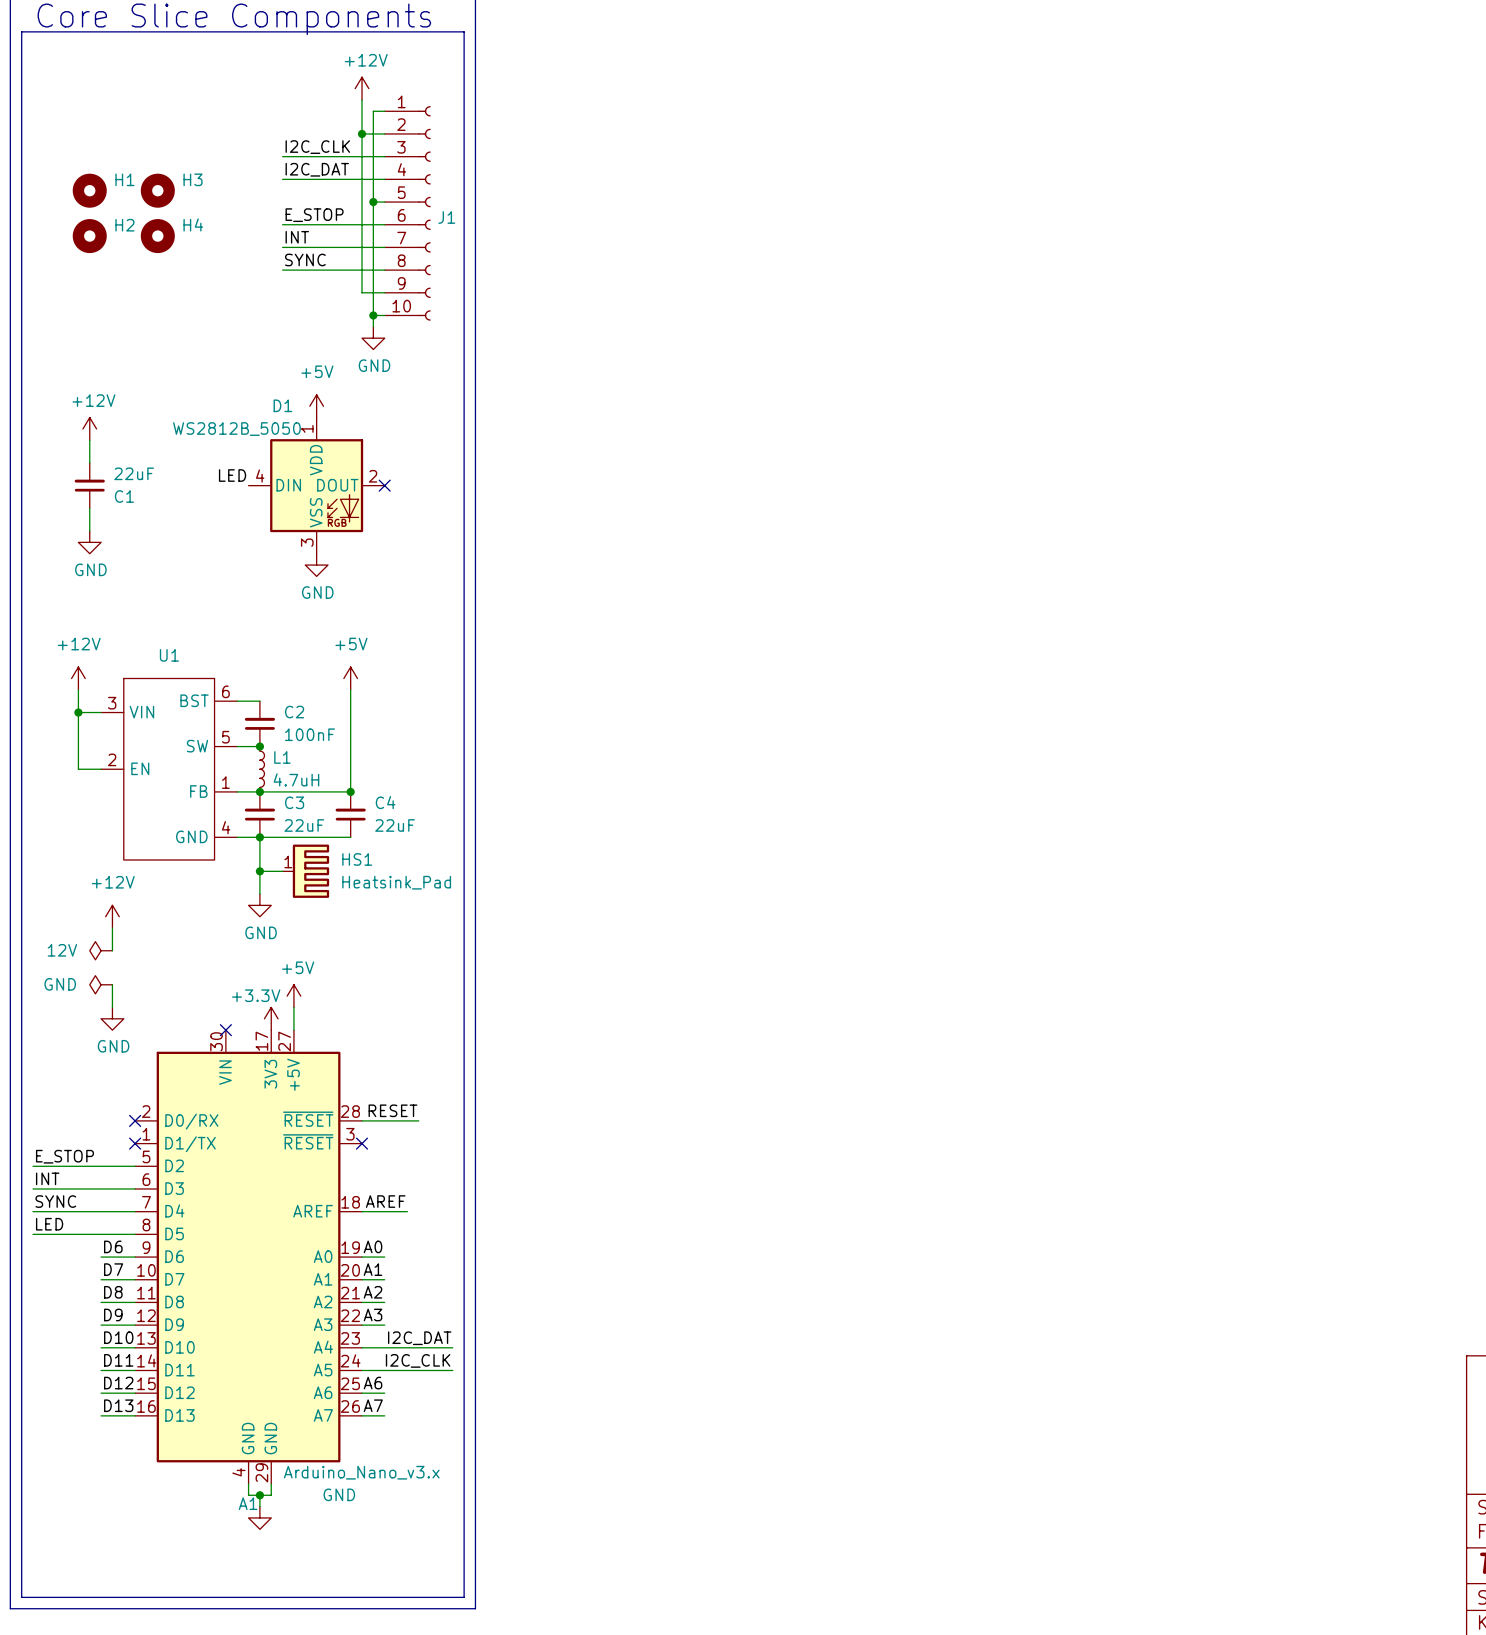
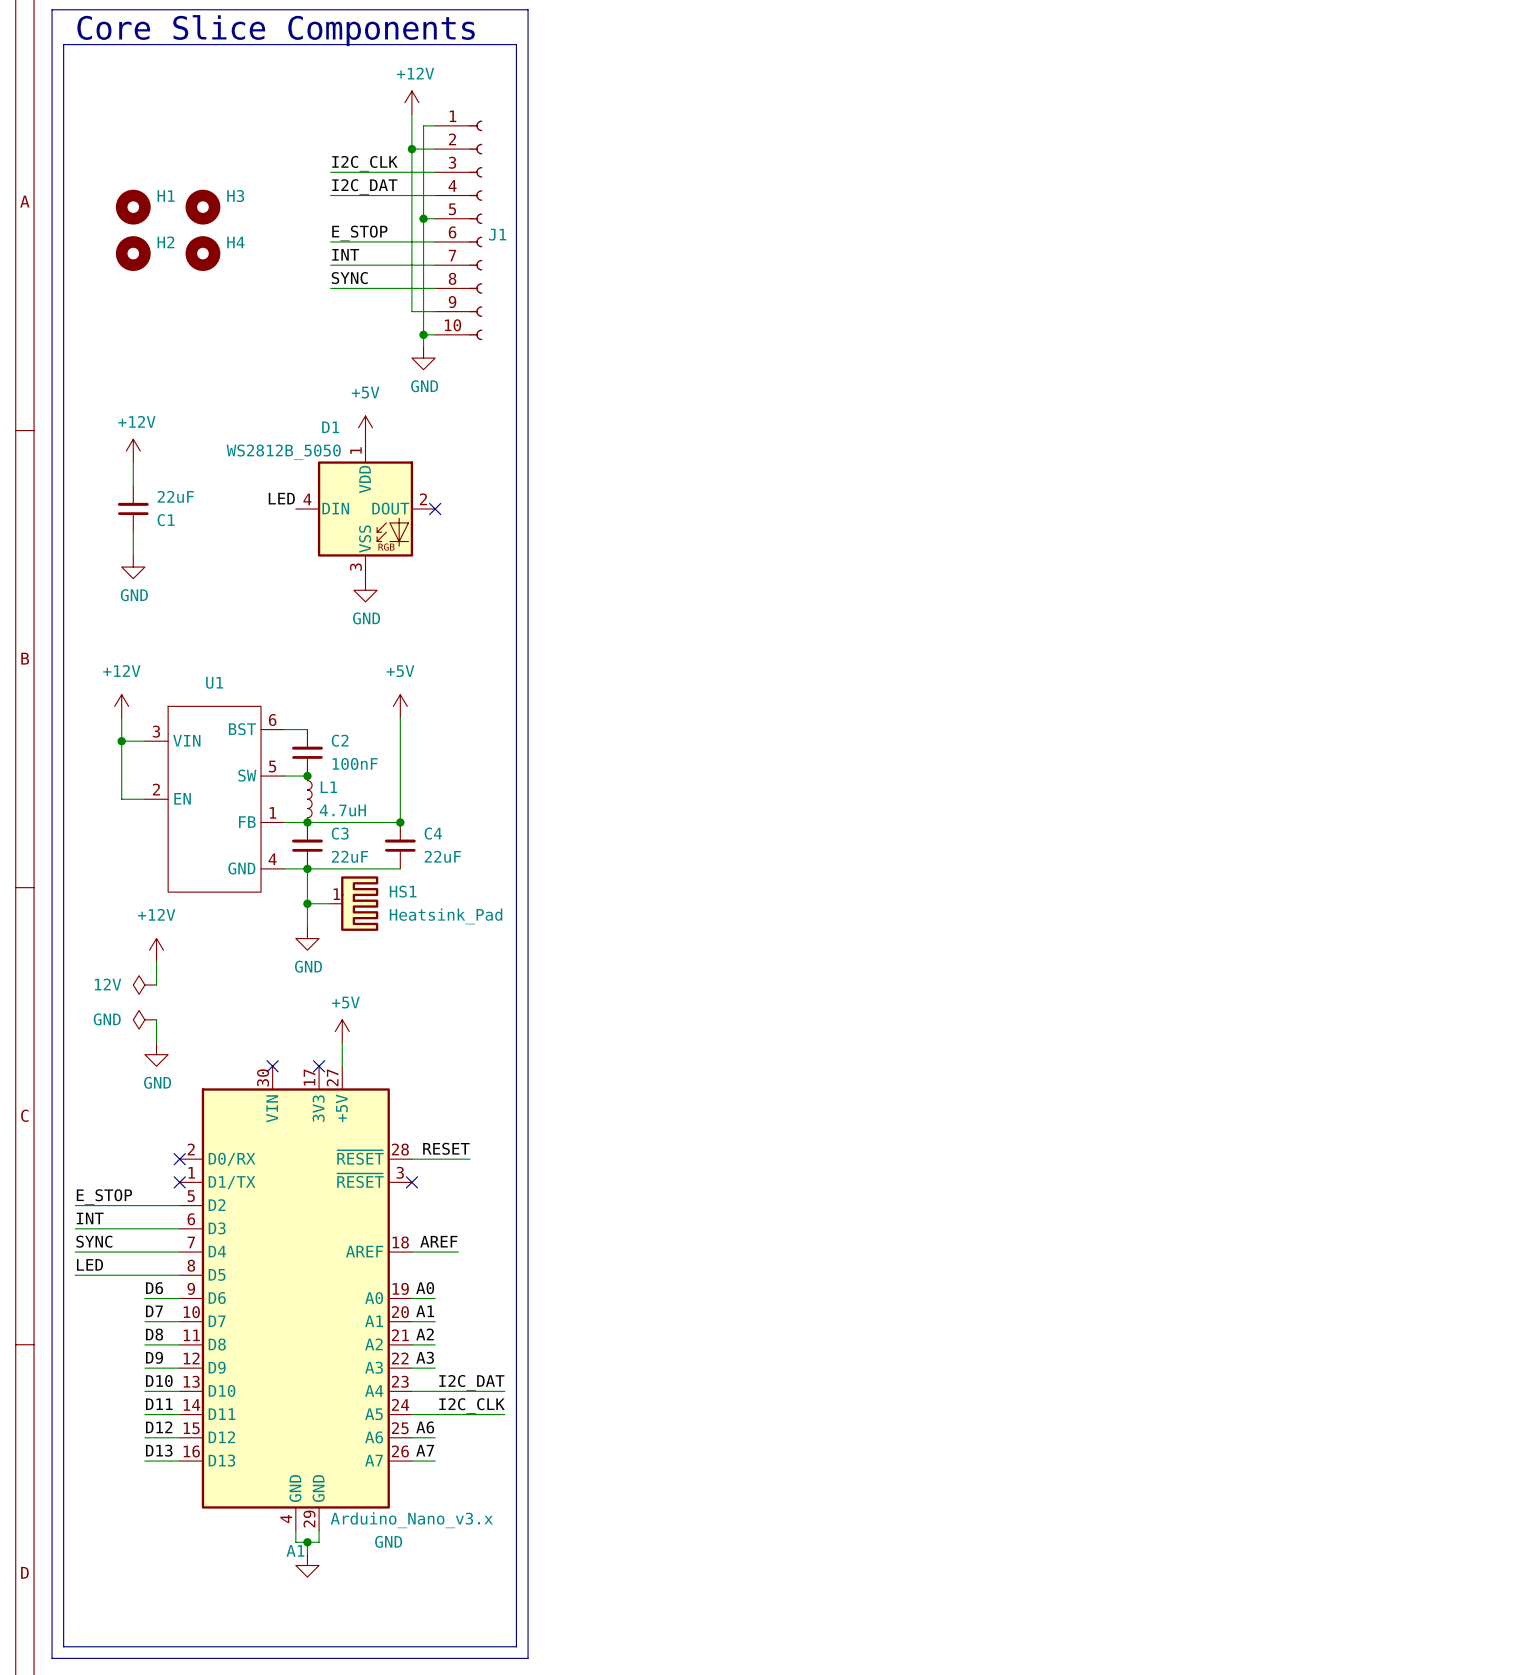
power symbol: +3.3V (271, 1018) -> none
no-connect mark: none -> (319, 1066)

